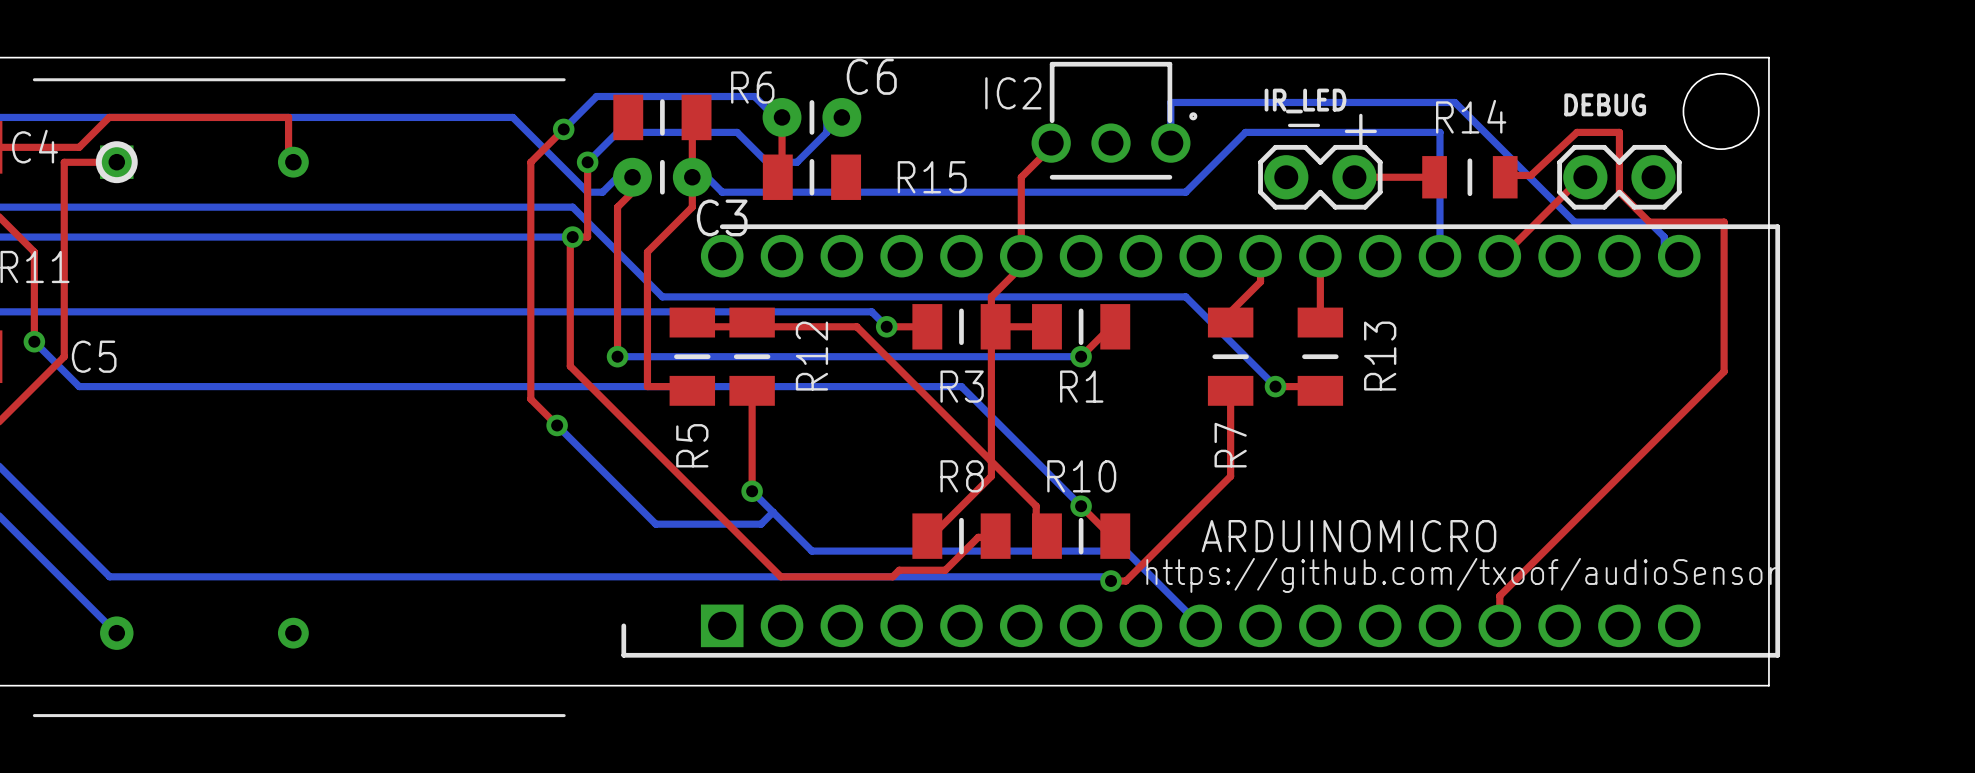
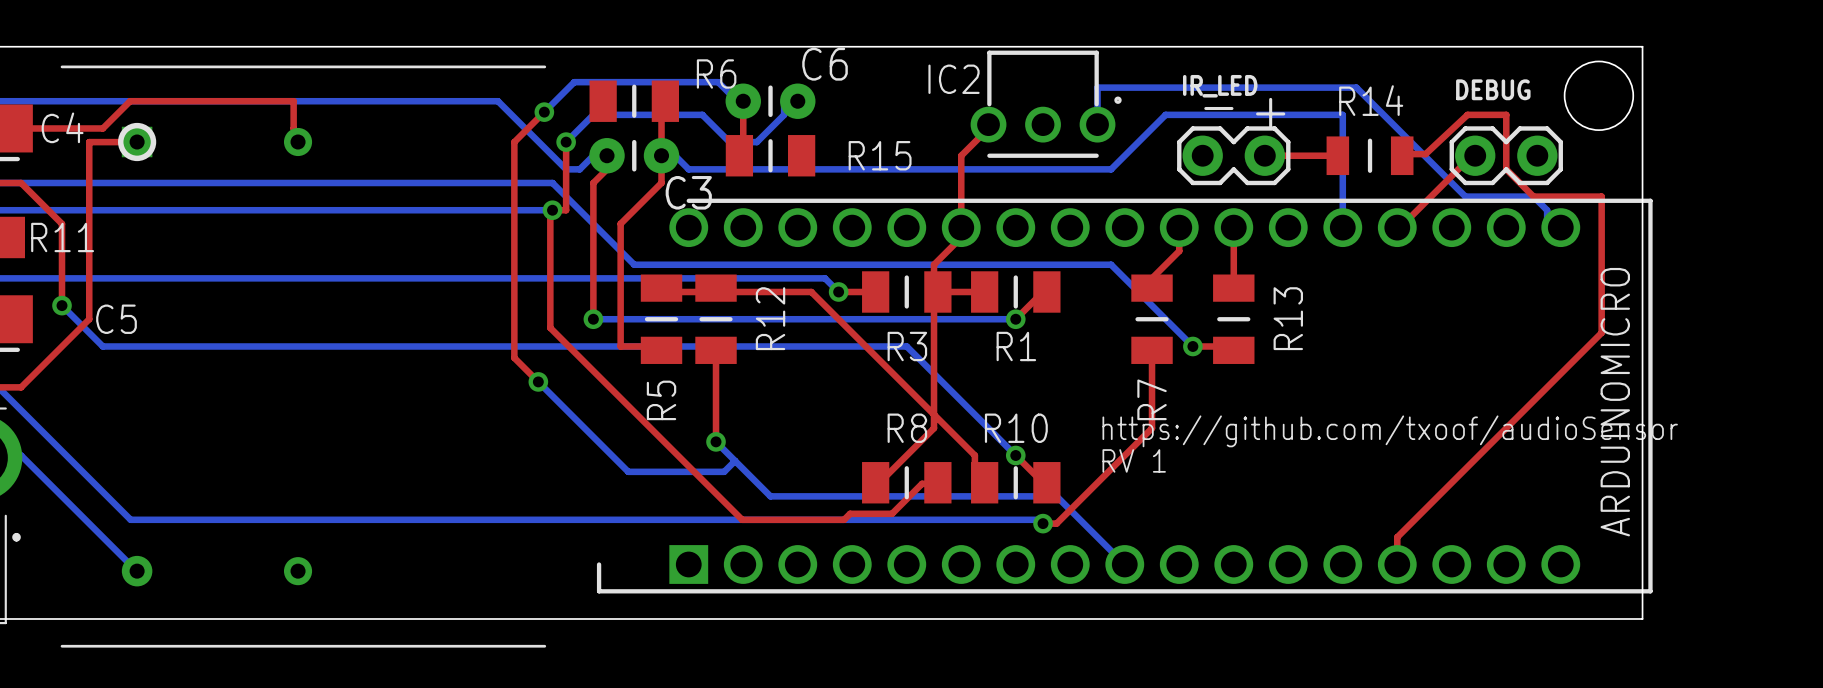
text: none -> RV 1 (1134, 460)
ARDUINOMICRO name rotation: 0° (1348, 536) -> 90° counterclockwise (1615, 402)
ARDUINOMICRO name position: ARDUINOMICRO (1348, 536) -> ARDUINOMICRO (1615, 402)
text position: https://github.com/txoof/audioSensor (1462, 575) -> https://github.com/txoof/audioSensor (1390, 431)

